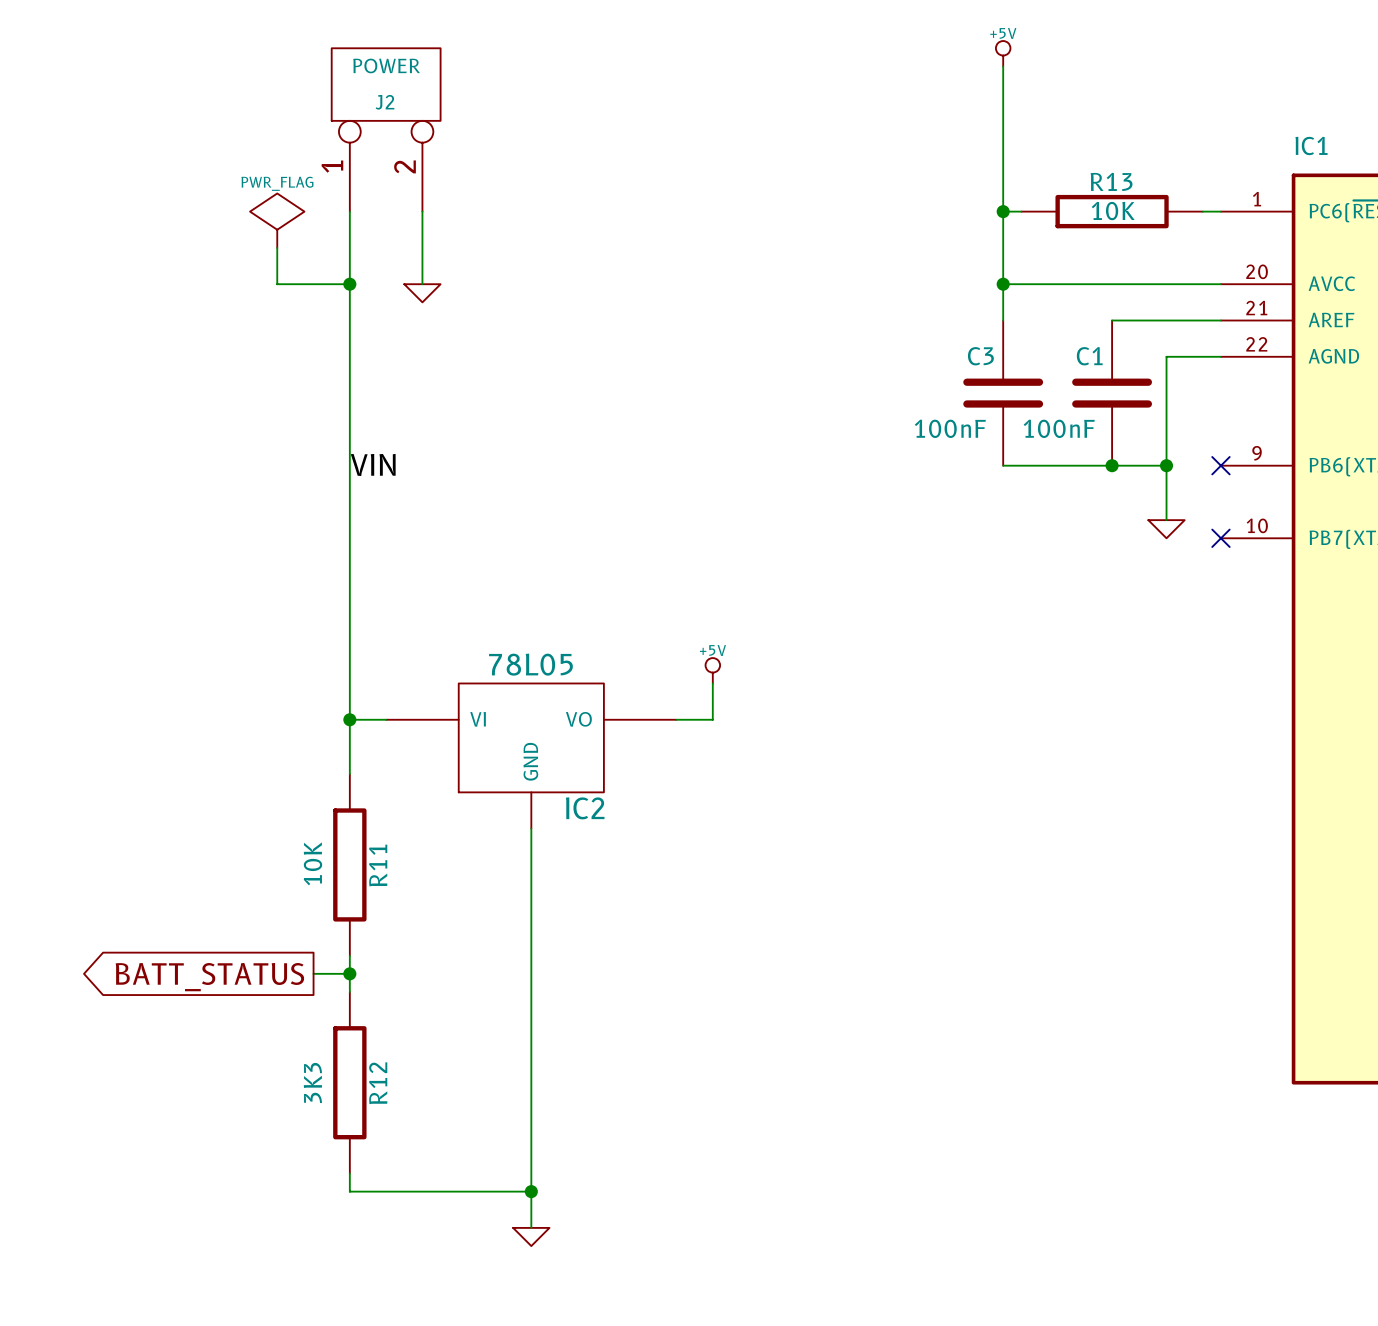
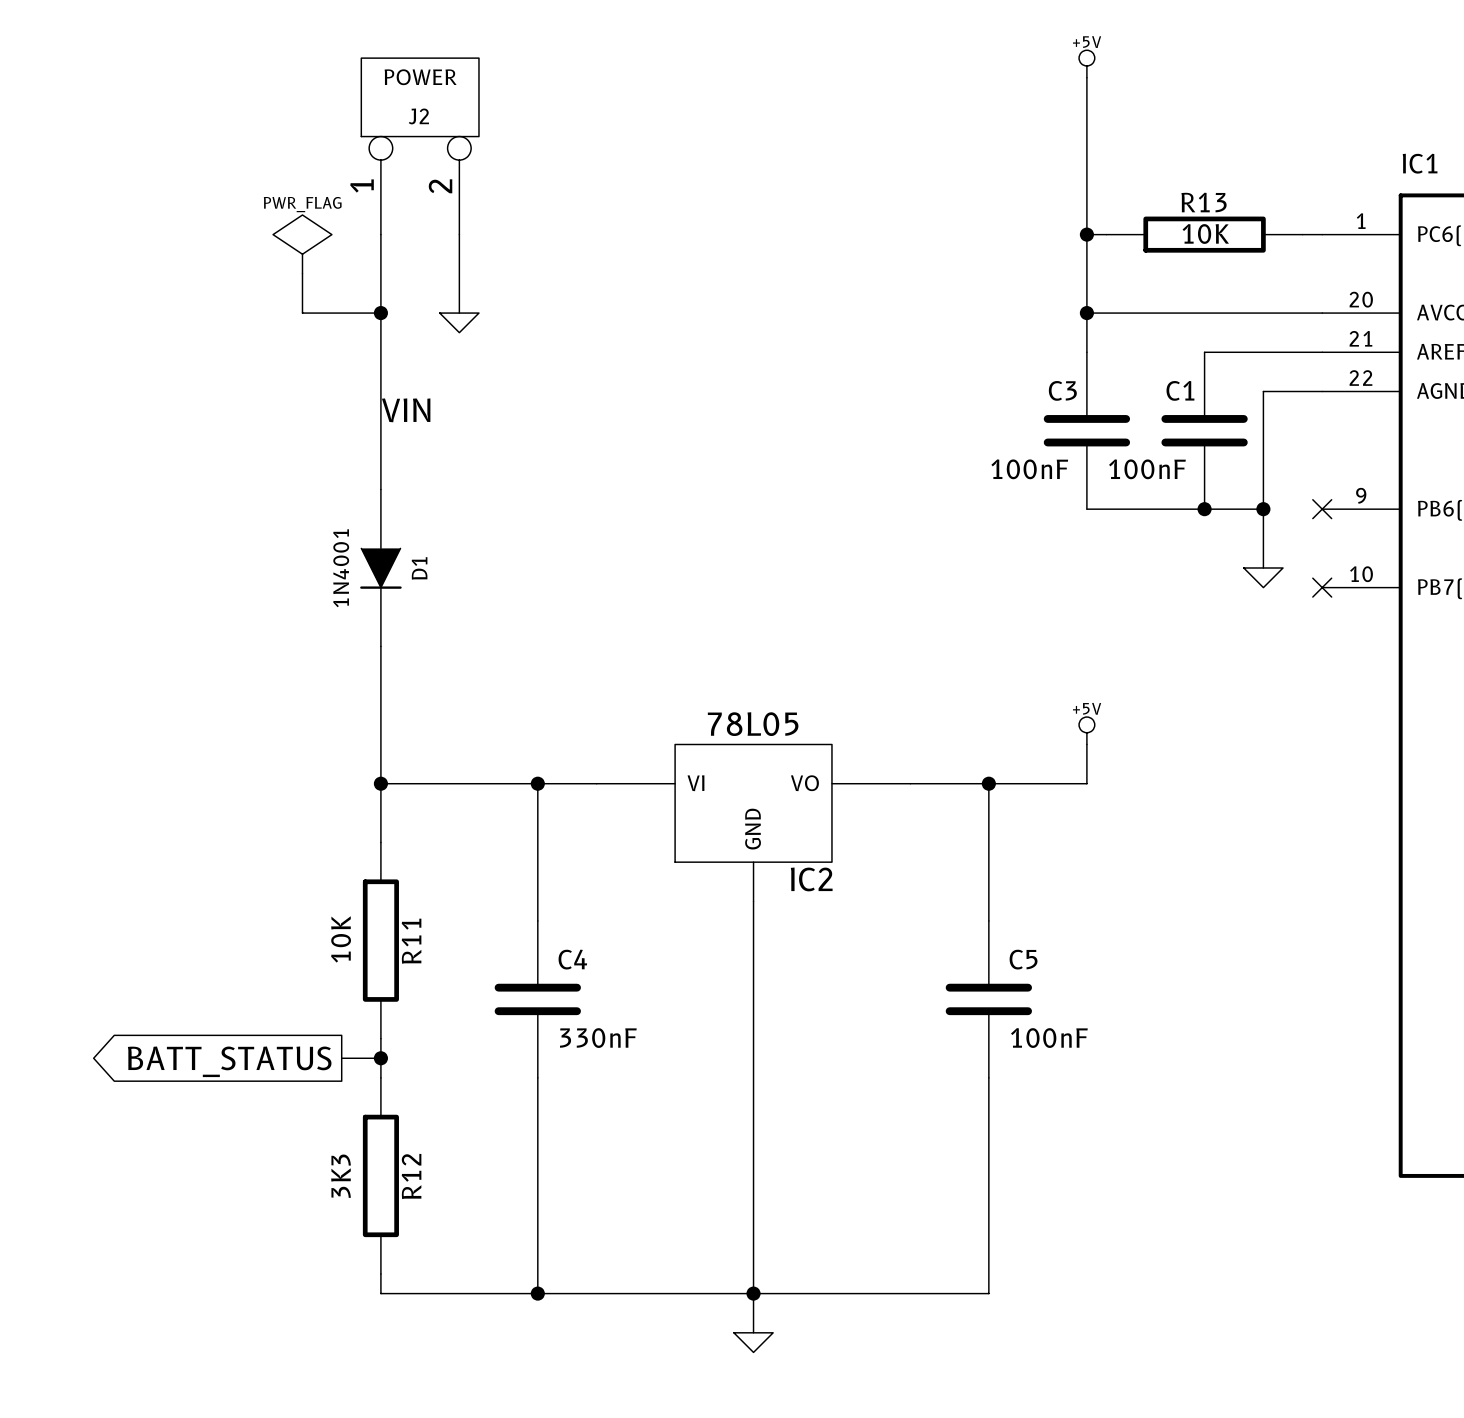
label position: VIN (373, 464) -> VIN (406, 410)
D1: none -> 1N4001 (380, 568)
power symbol position: +5V (712, 670) -> +5V (1086, 730)
wire: (712, 683) (712, 719) (676, 719) -> none
wire: none -> (1086, 744) (1086, 783) (910, 783)
wire: none -> (420, 783) (596, 783)
wire: none -> (537, 783) (537, 920)
junction: none -> (537, 783)
wire: none -> (988, 783) (988, 920)
junction: none -> (988, 783)
IC2 position: (531, 756) -> (753, 822)
wire: (531, 828) (531, 1227) -> (753, 901) (753, 1332)
C4: none -> 330nF (537, 999)
C5: none -> 100nF (988, 999)
wire: none -> (537, 1077) (537, 1293)
wire: none -> (988, 1077) (988, 1293) (577, 1293)
junction position: (531, 1191) -> (537, 1293)
junction: none -> (753, 1293)
power symbol position: (531, 1237) -> (753, 1342)

